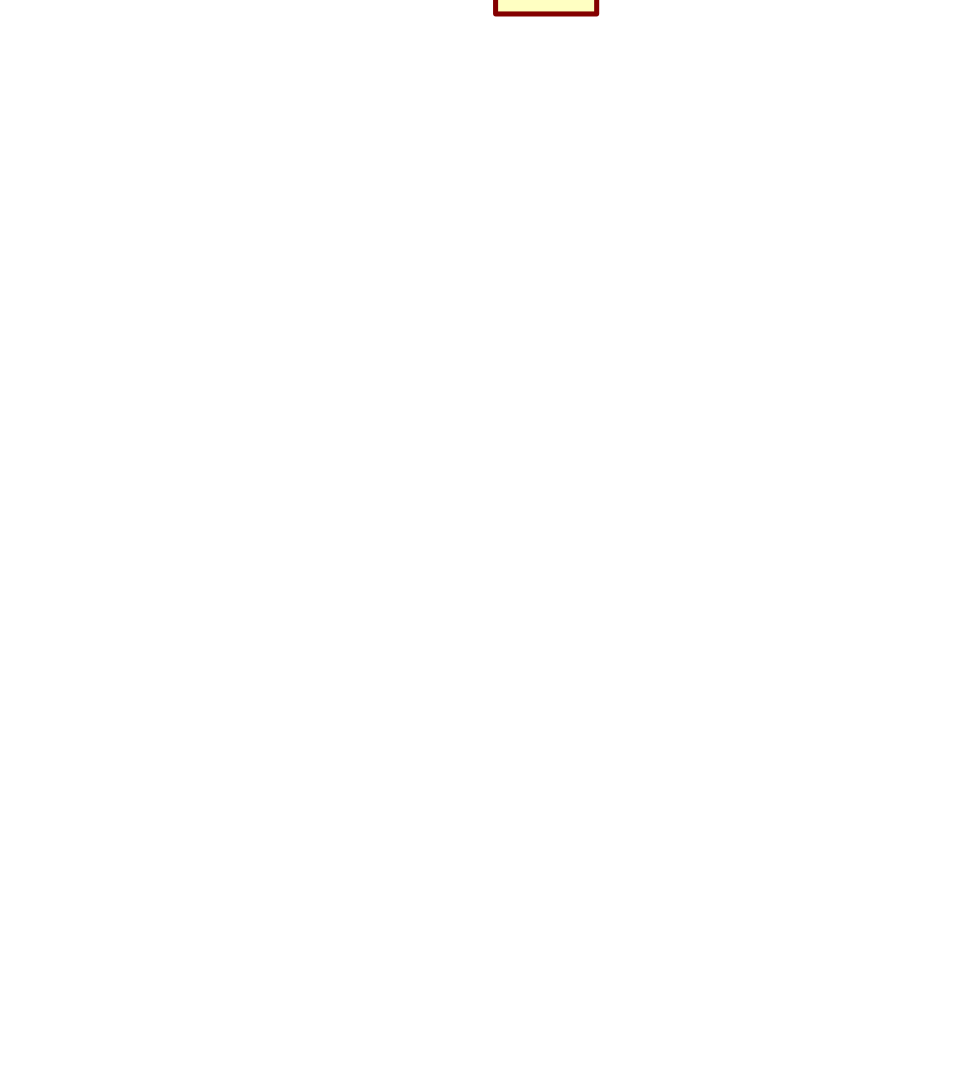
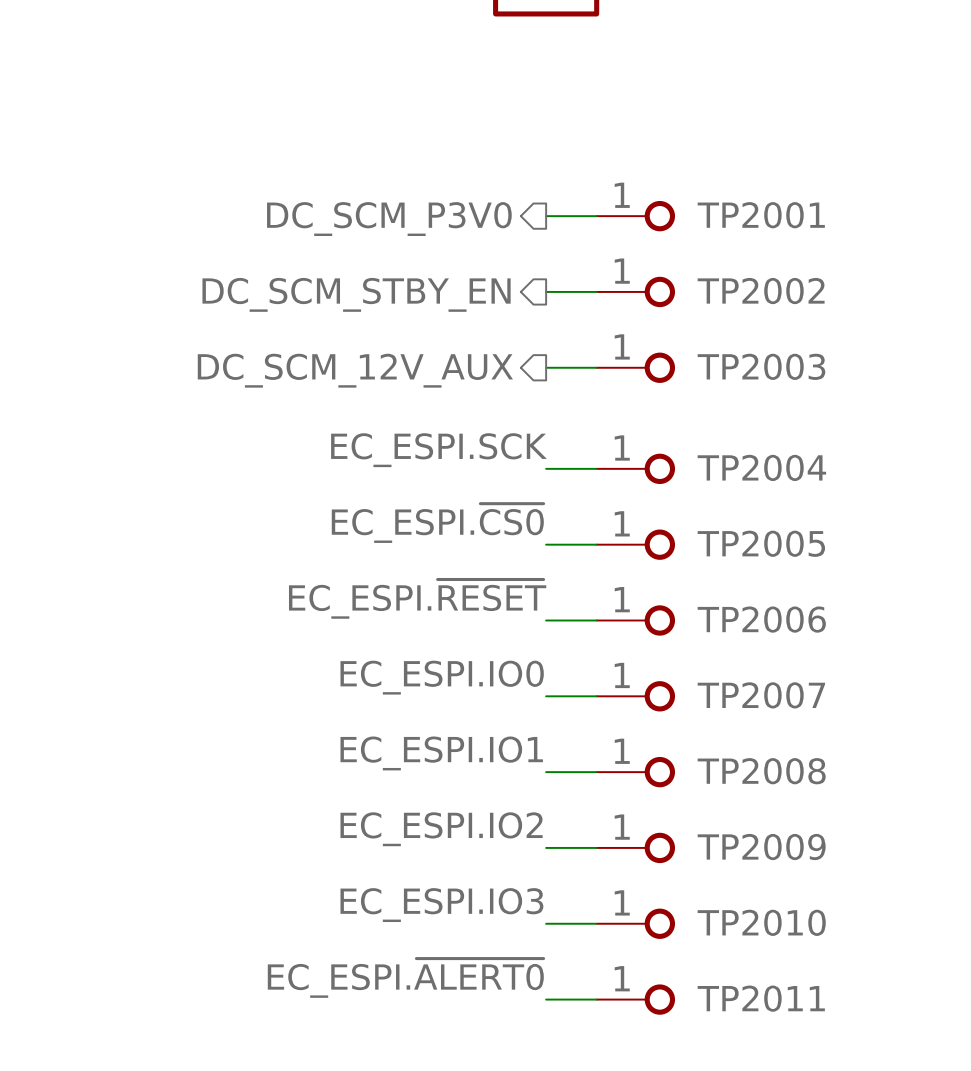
hierarchical label: none -> DC_SCM_P3V0 (389, 219)
wire: none -> (546, 216) (596, 216)
TP2001: none -> (635, 216)
hierarchical label: none -> DC_SCM_STBY_EN (356, 294)
wire: none -> (546, 291) (596, 291)
TP2002: none -> (635, 291)
hierarchical label: none -> DC_SCM_12V_AUX (355, 370)
wire: none -> (546, 367) (596, 367)
TP2003: none -> (635, 367)
label: none -> EC_ESPI.SCK (438, 450)
wire: none -> (546, 468) (596, 468)
TP2004: none -> (635, 468)
label: none -> EC_ESPI.~{CS0} (437, 523)
wire: none -> (546, 544) (596, 544)
TP2005: none -> (635, 544)
label: none -> EC_ESPI.~{RESET} (417, 599)
wire: none -> (546, 620) (596, 620)
TP2006: none -> (635, 620)
label: none -> EC_ESPI.IO0 (442, 677)
wire: none -> (546, 696) (596, 696)
TP2007: none -> (635, 696)
label: none -> EC_ESPI.IO1 (441, 753)
wire: none -> (546, 772) (596, 772)
TP2008: none -> (635, 772)
label: none -> EC_ESPI.IO2 (441, 829)
wire: none -> (546, 847) (596, 847)
TP2009: none -> (635, 847)
label: none -> EC_ESPI.IO3 (441, 905)
wire: none -> (546, 923) (596, 923)
TP2010: none -> (635, 923)
label: none -> EC_ESPI.~{ALERT0} (405, 978)
wire: none -> (546, 999) (596, 999)
TP2011: none -> (635, 999)

